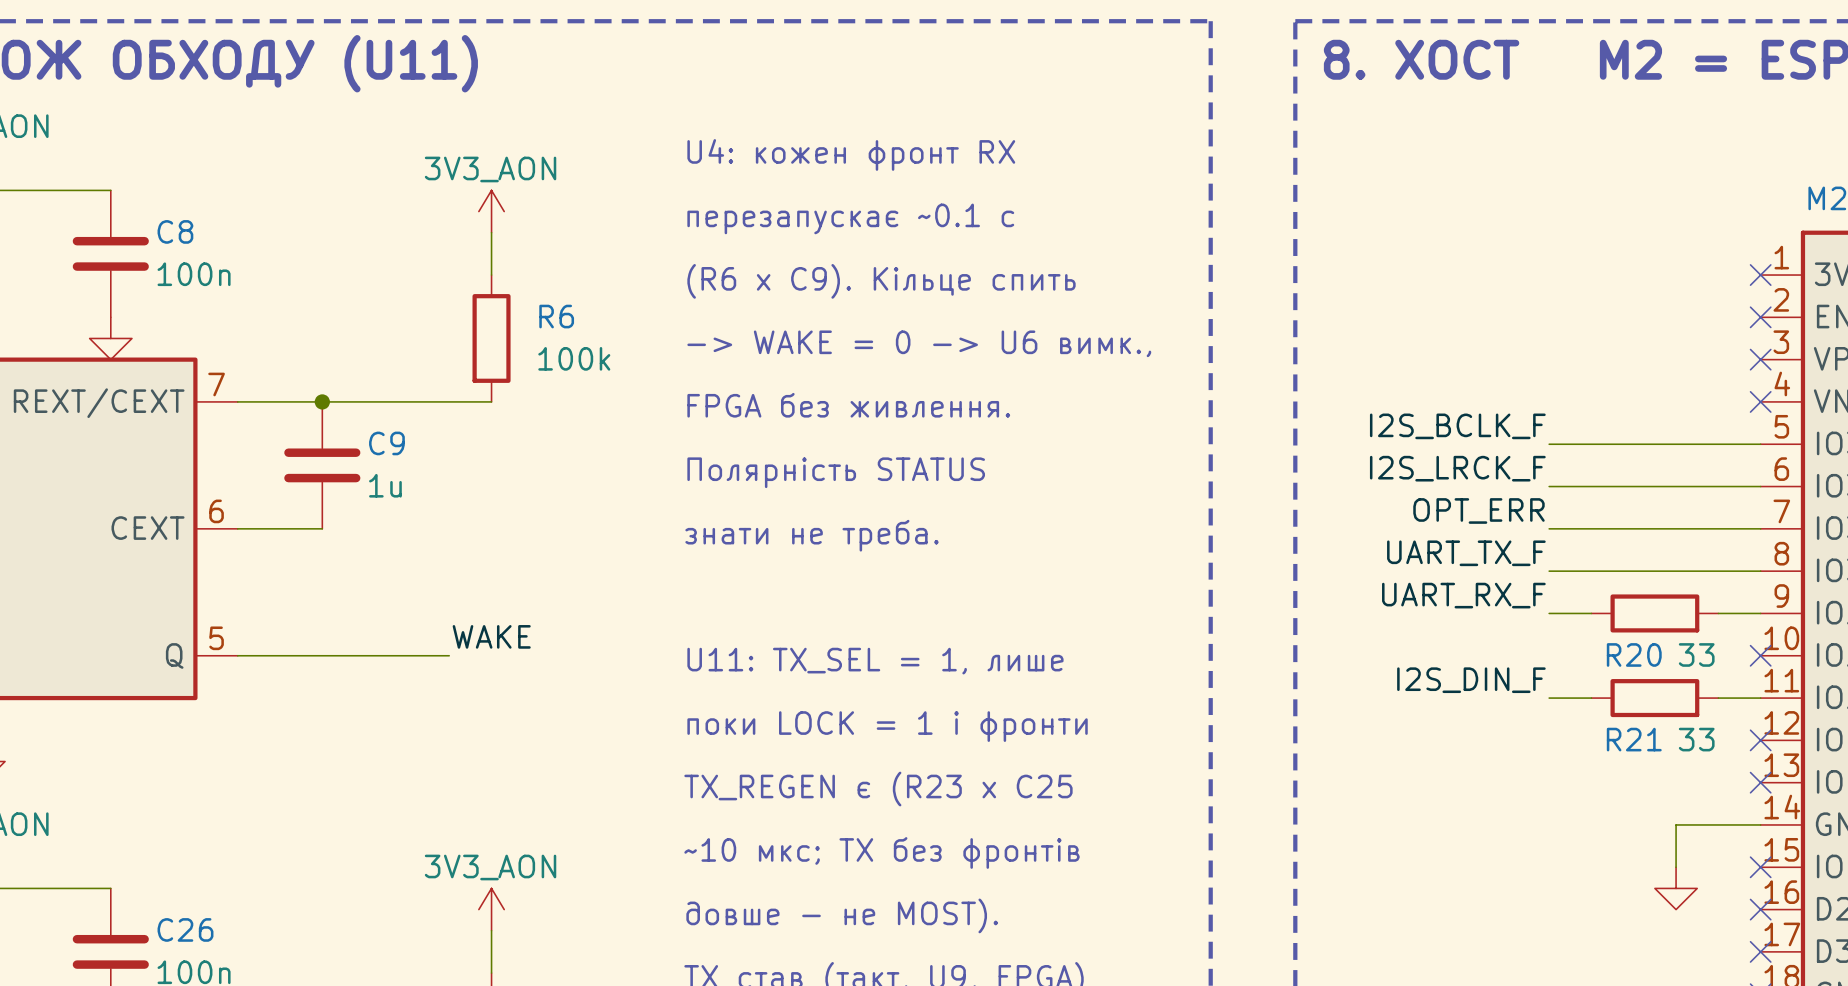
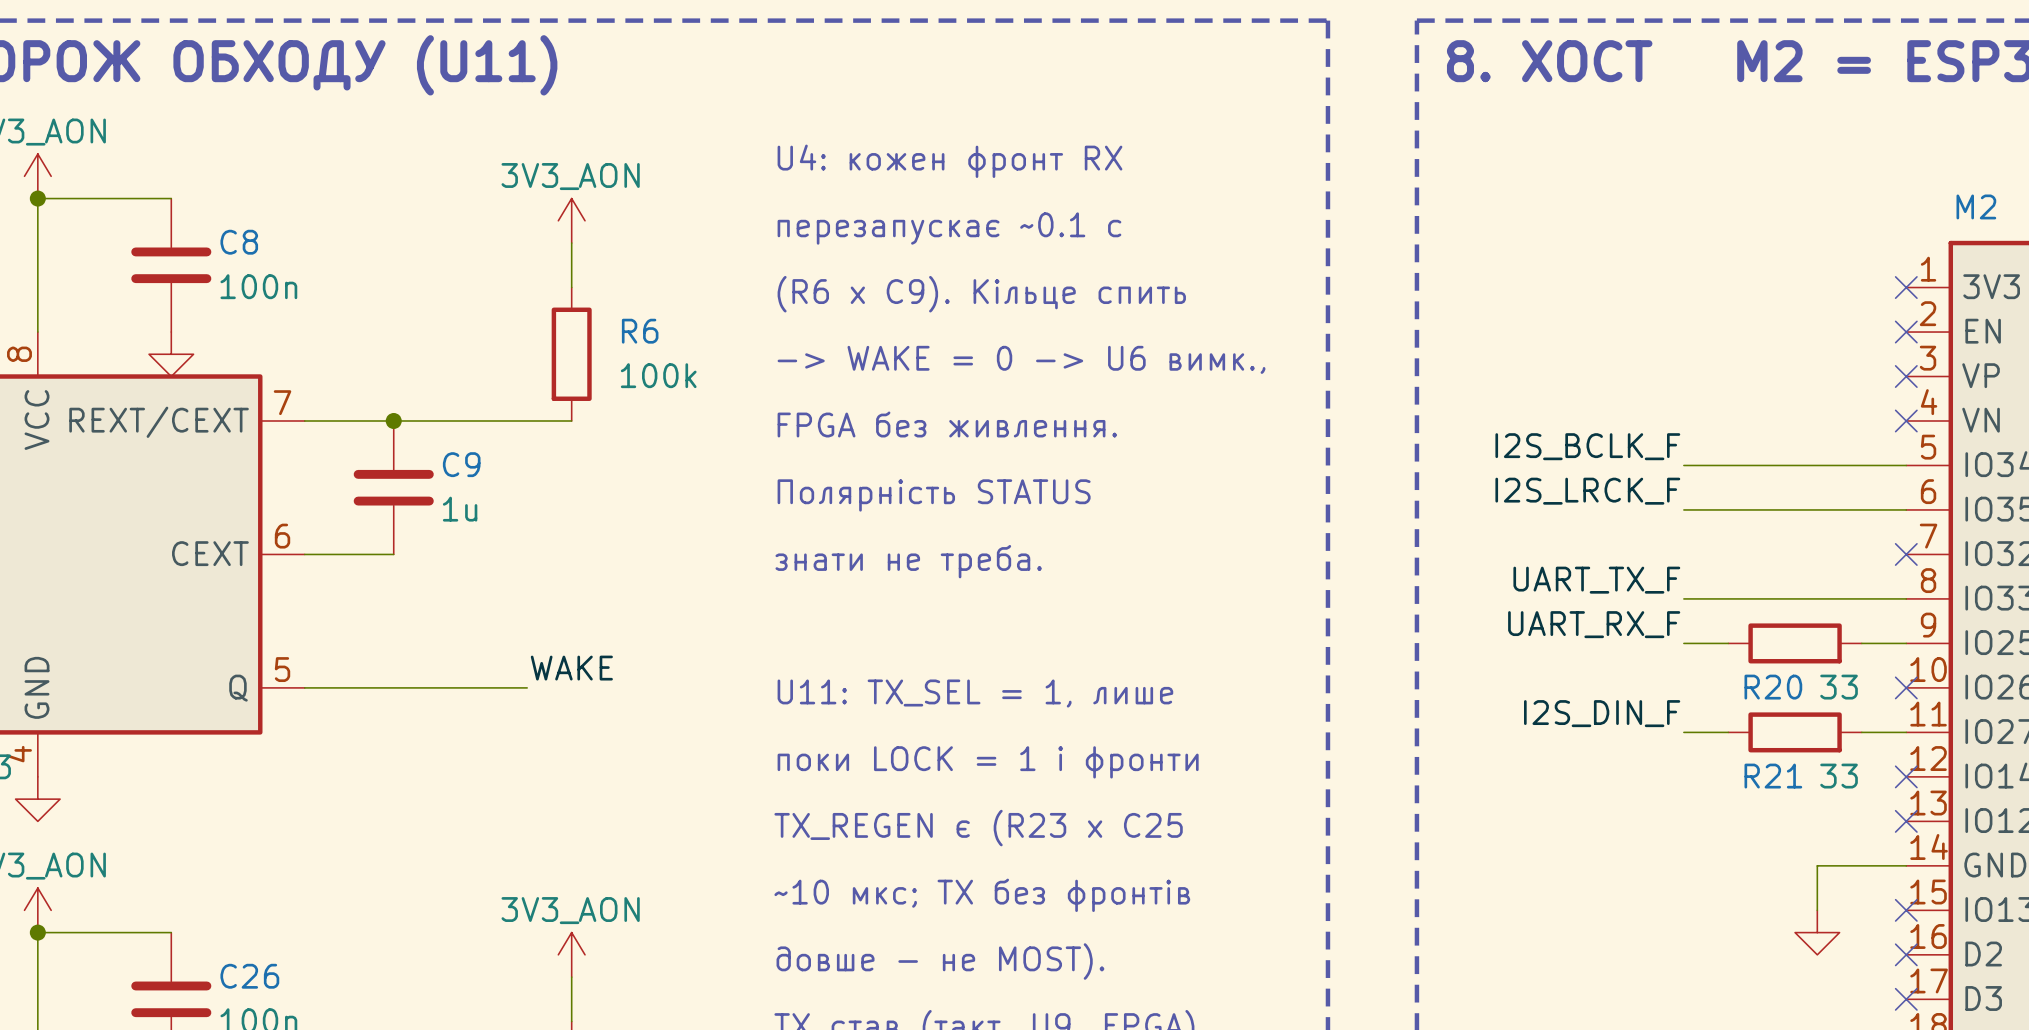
label: OPT_ERR (1478, 510) -> none
wire: (1549, 528) (1760, 528) -> none
no-connect mark: none -> (1906, 554)

